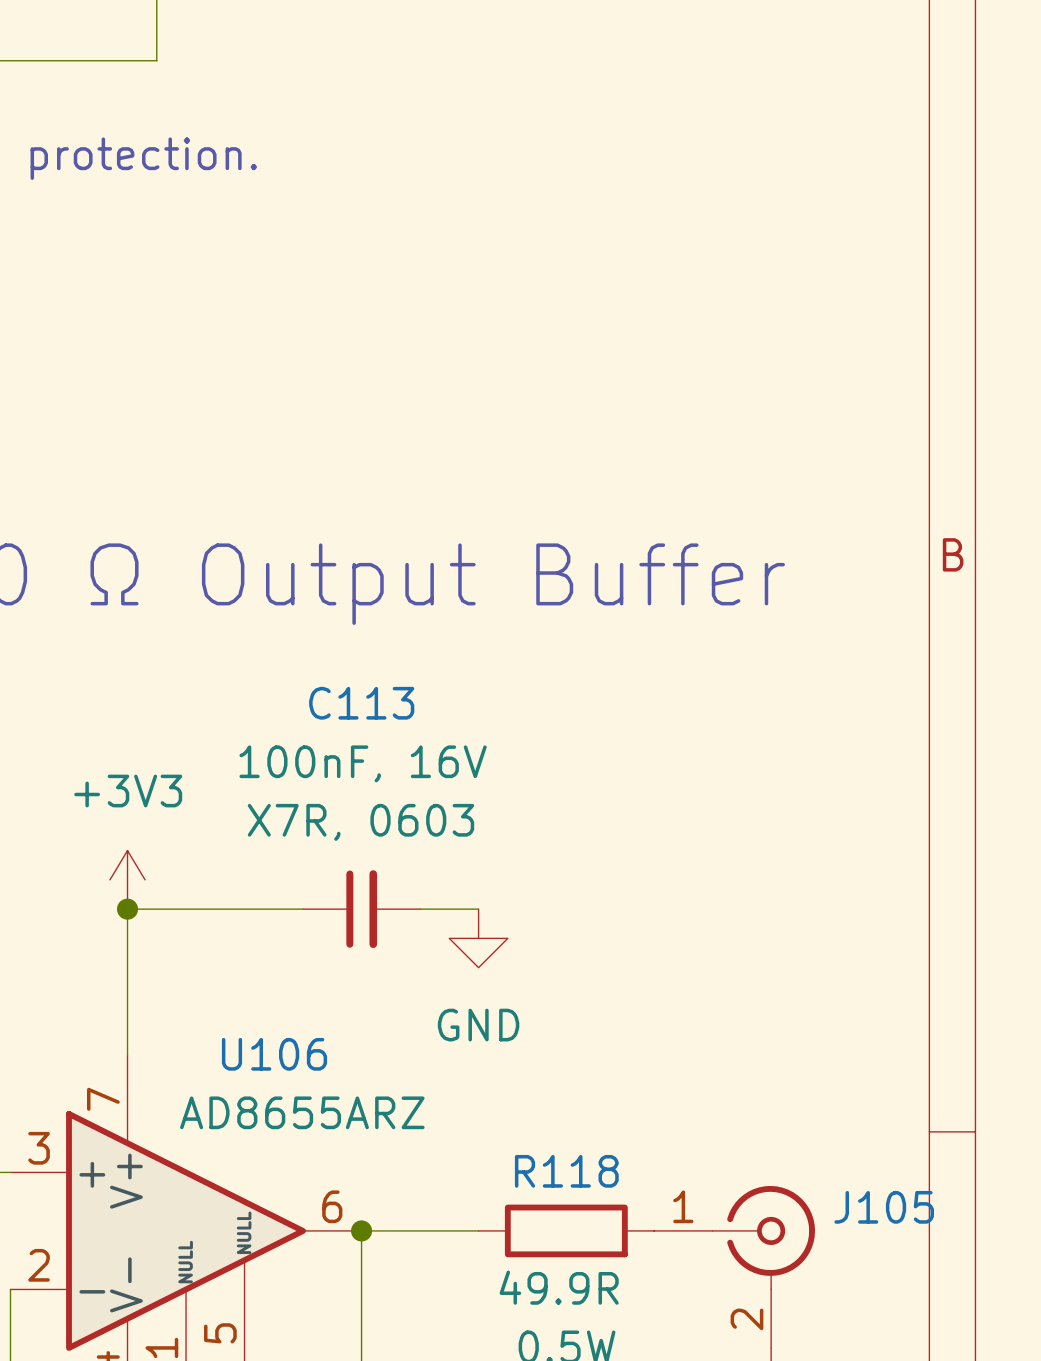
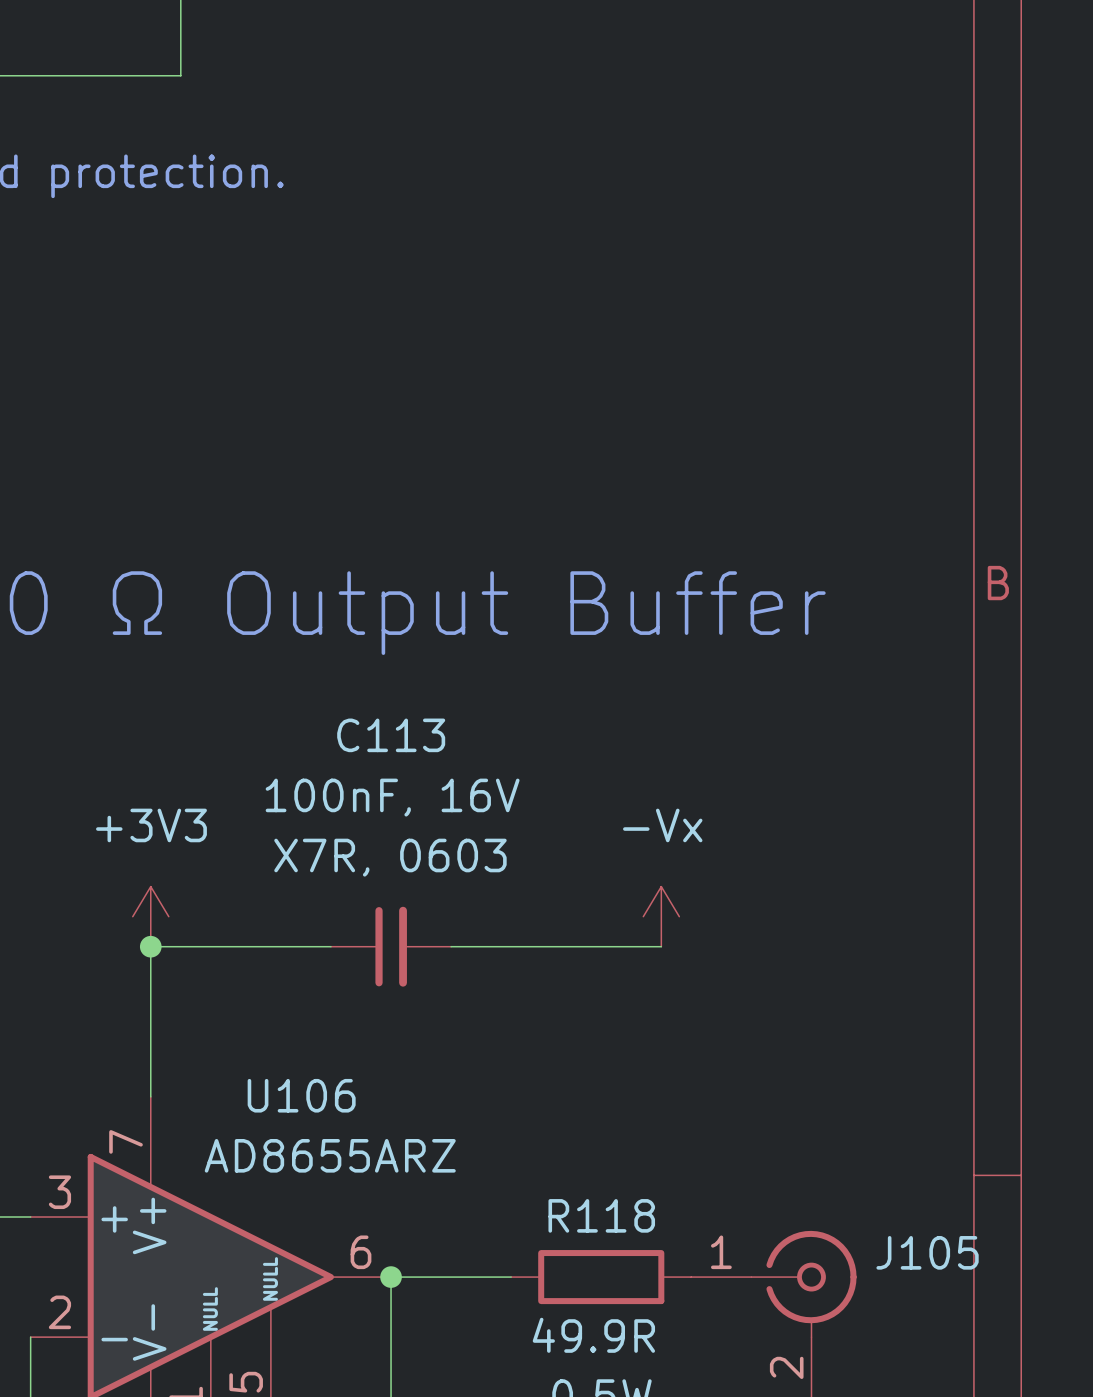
power symbol: none -> -Vx (661, 916)
wire: none -> (511, 946) (661, 946)
power symbol: GND (478, 938) -> none

